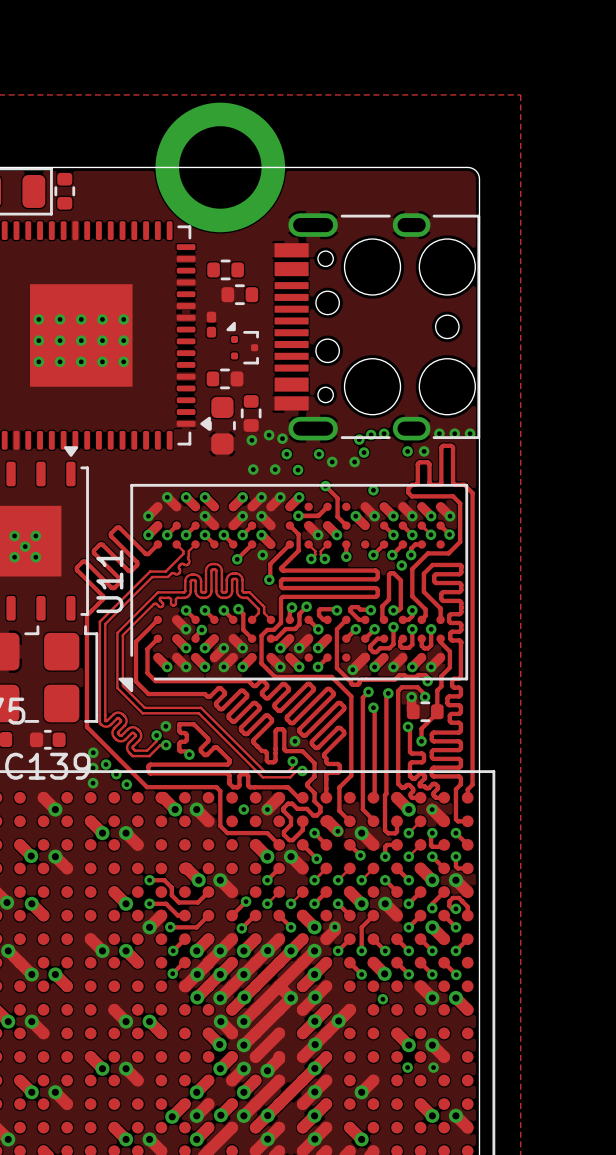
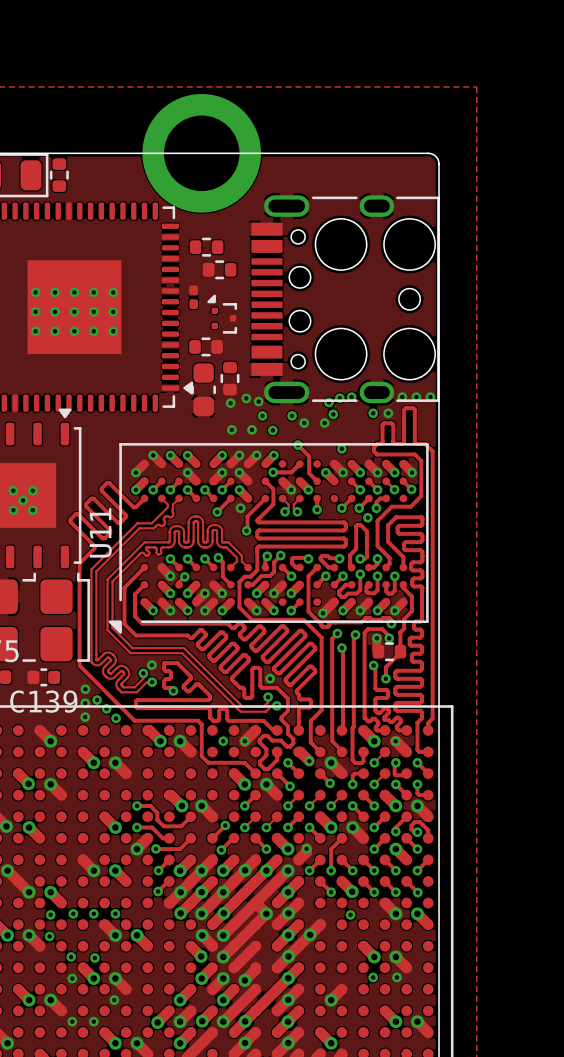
via: none -> (73, 913)
via: none -> (93, 913)
via: none -> (115, 913)
via: none -> (50, 914)
via: none -> (49, 936)
via: none -> (71, 956)
via: none -> (94, 958)
via: none -> (72, 978)
via: none -> (114, 1000)
via: none -> (72, 1021)
via: none -> (93, 1021)

